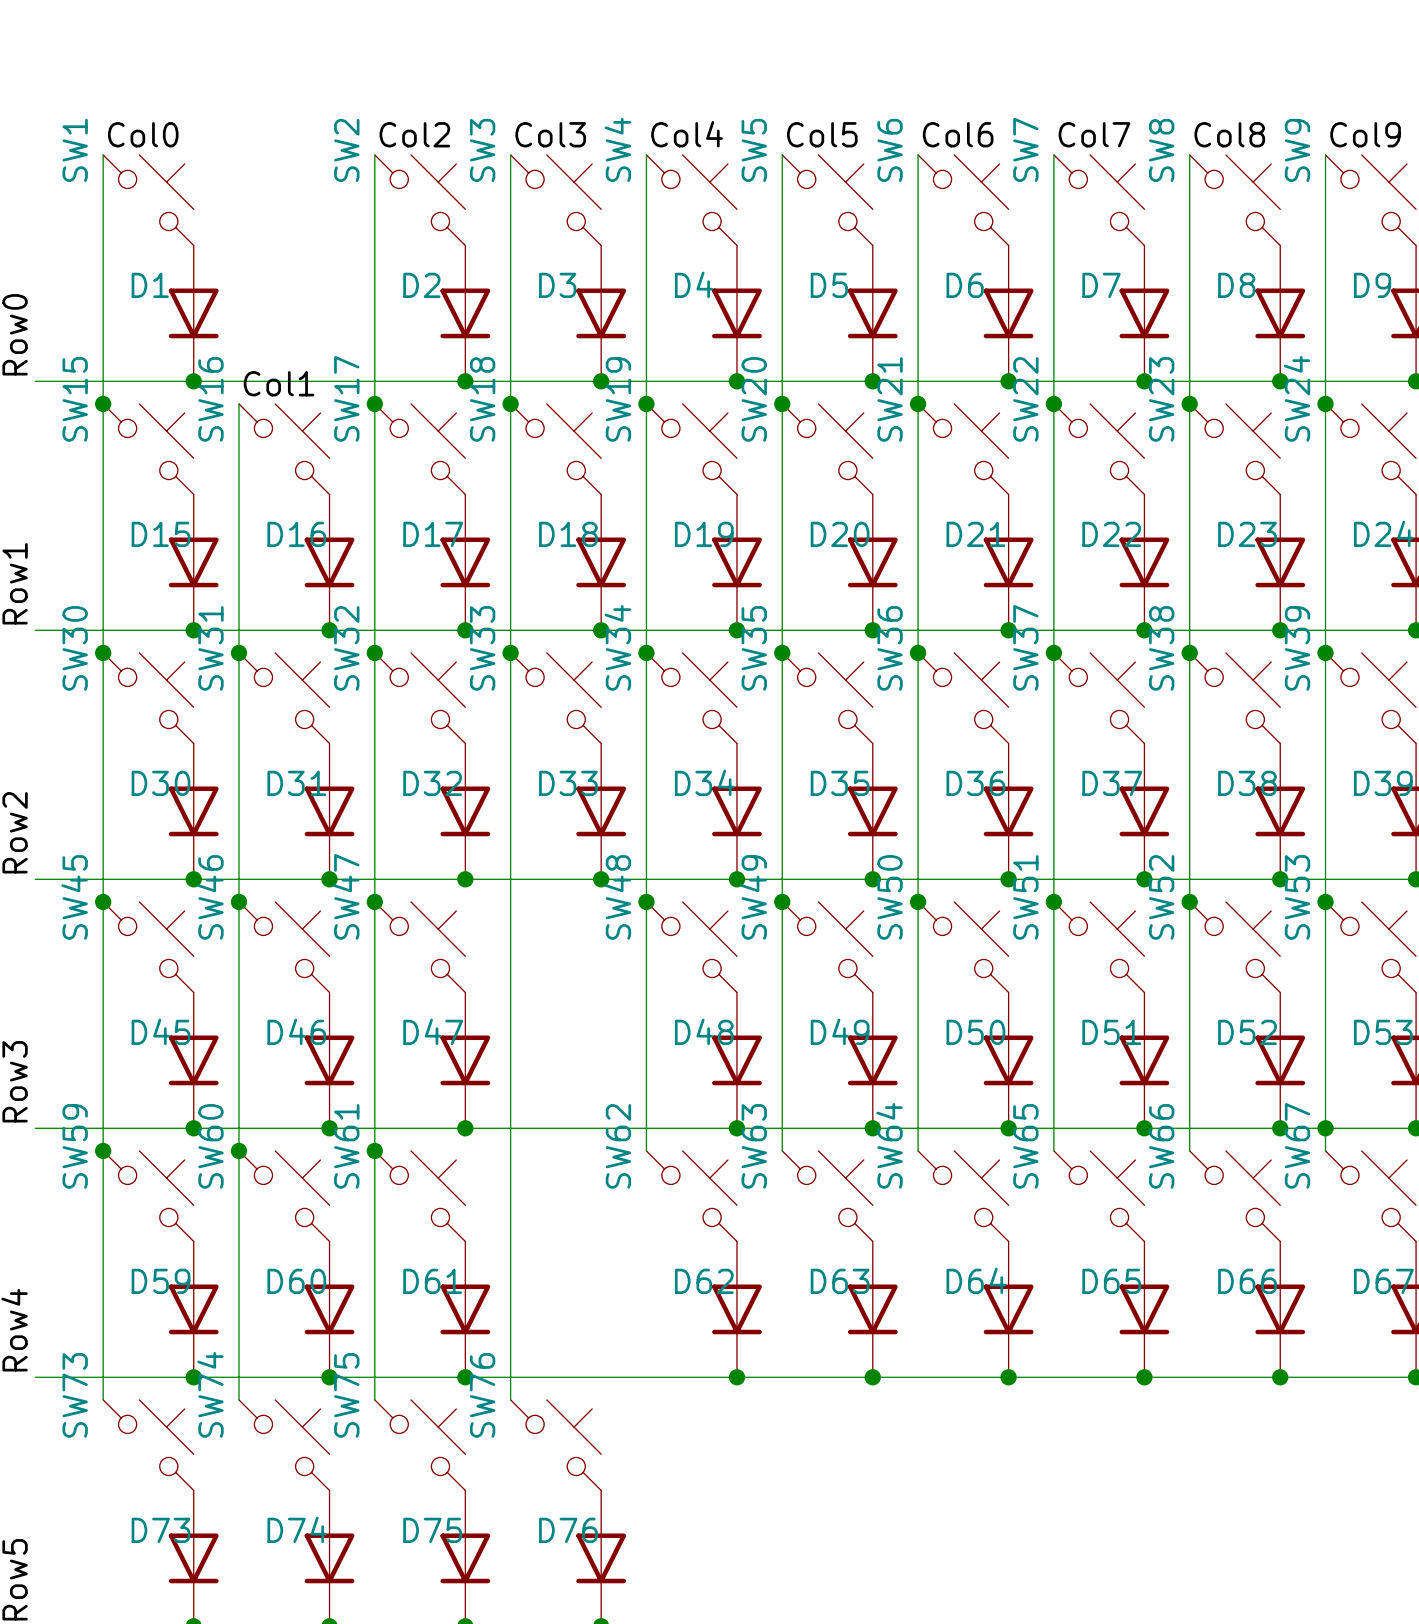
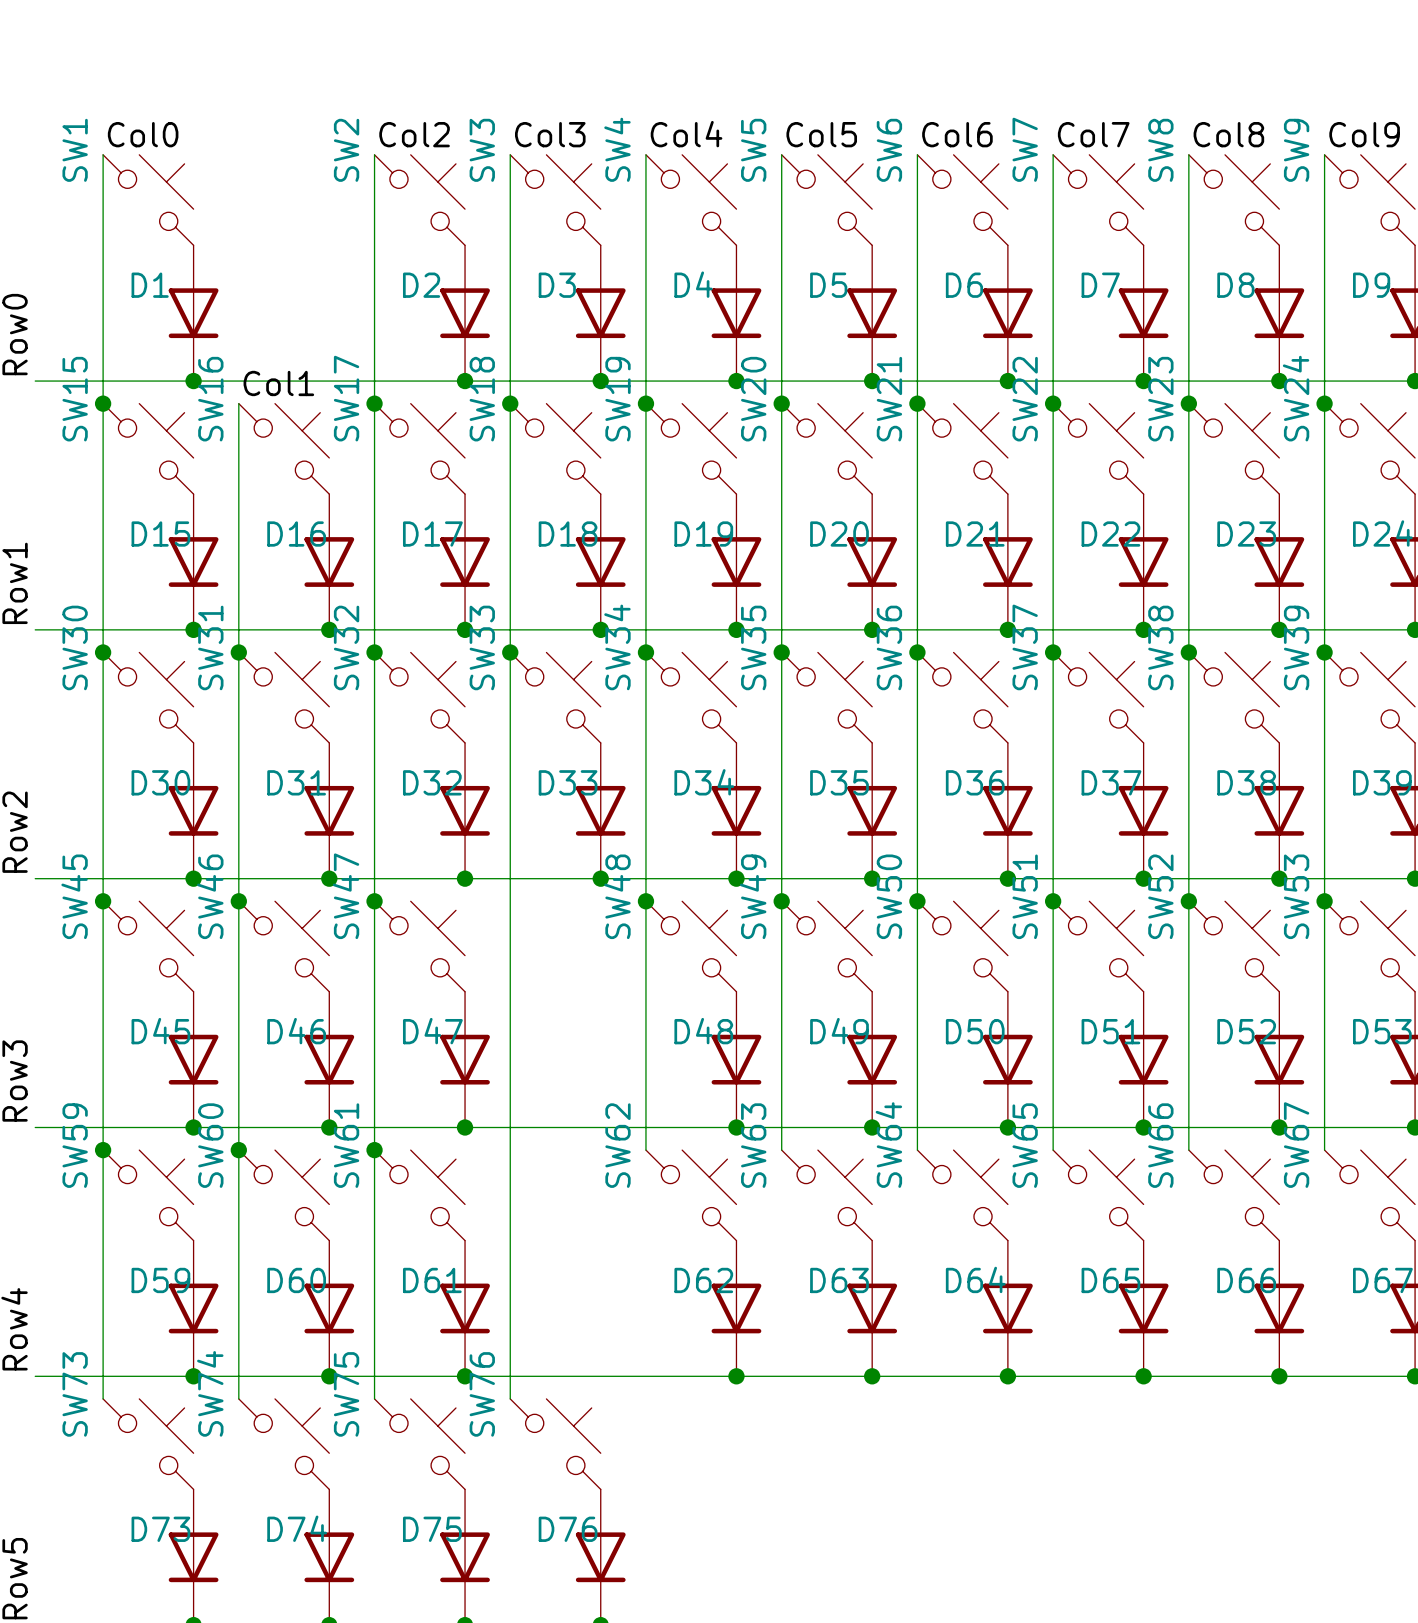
junction: (1325, 1128) -> none

